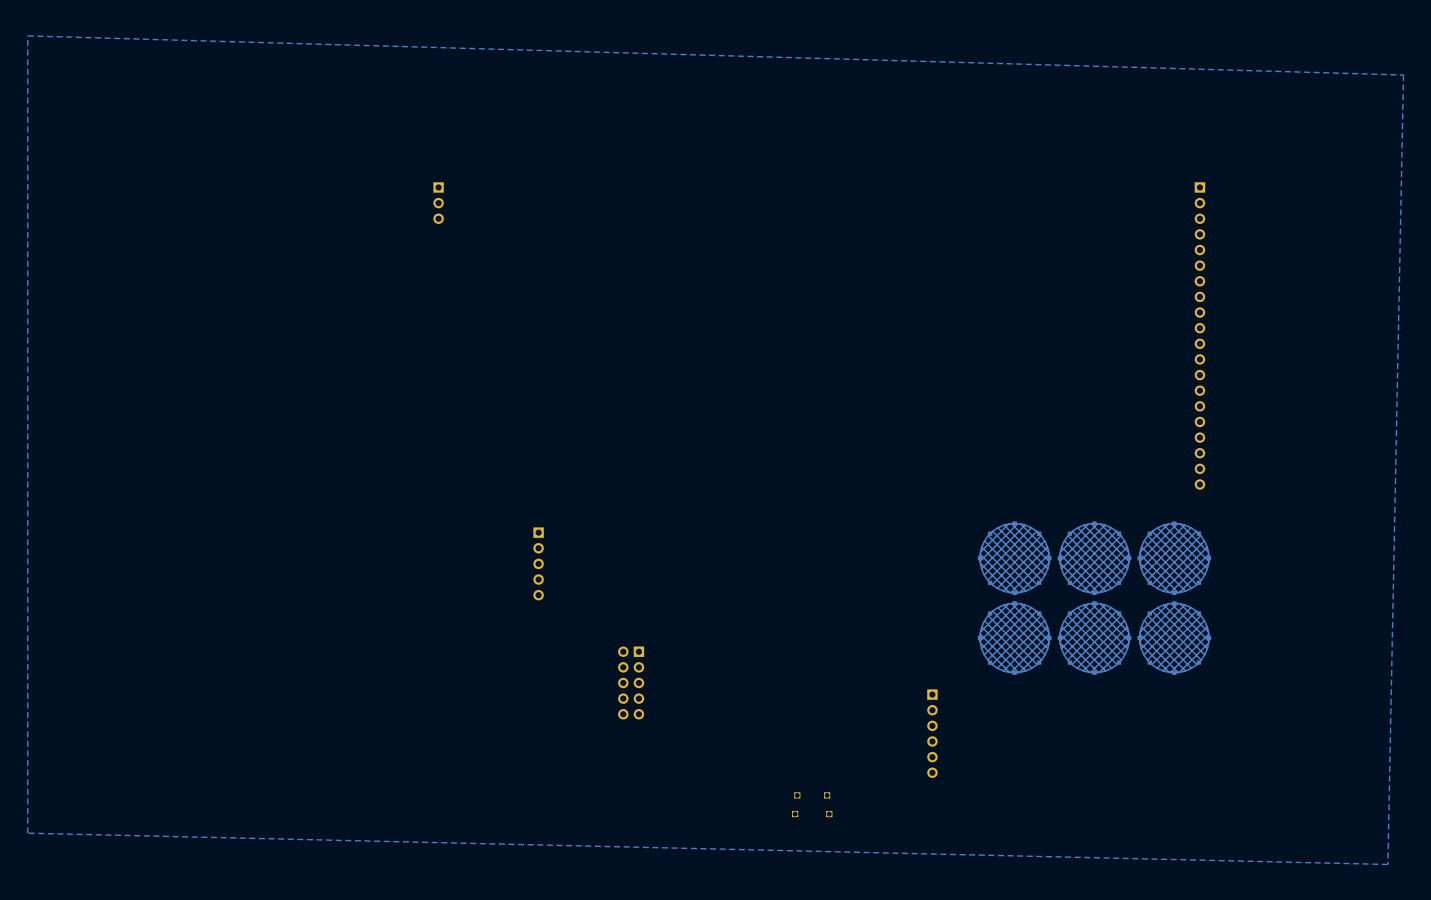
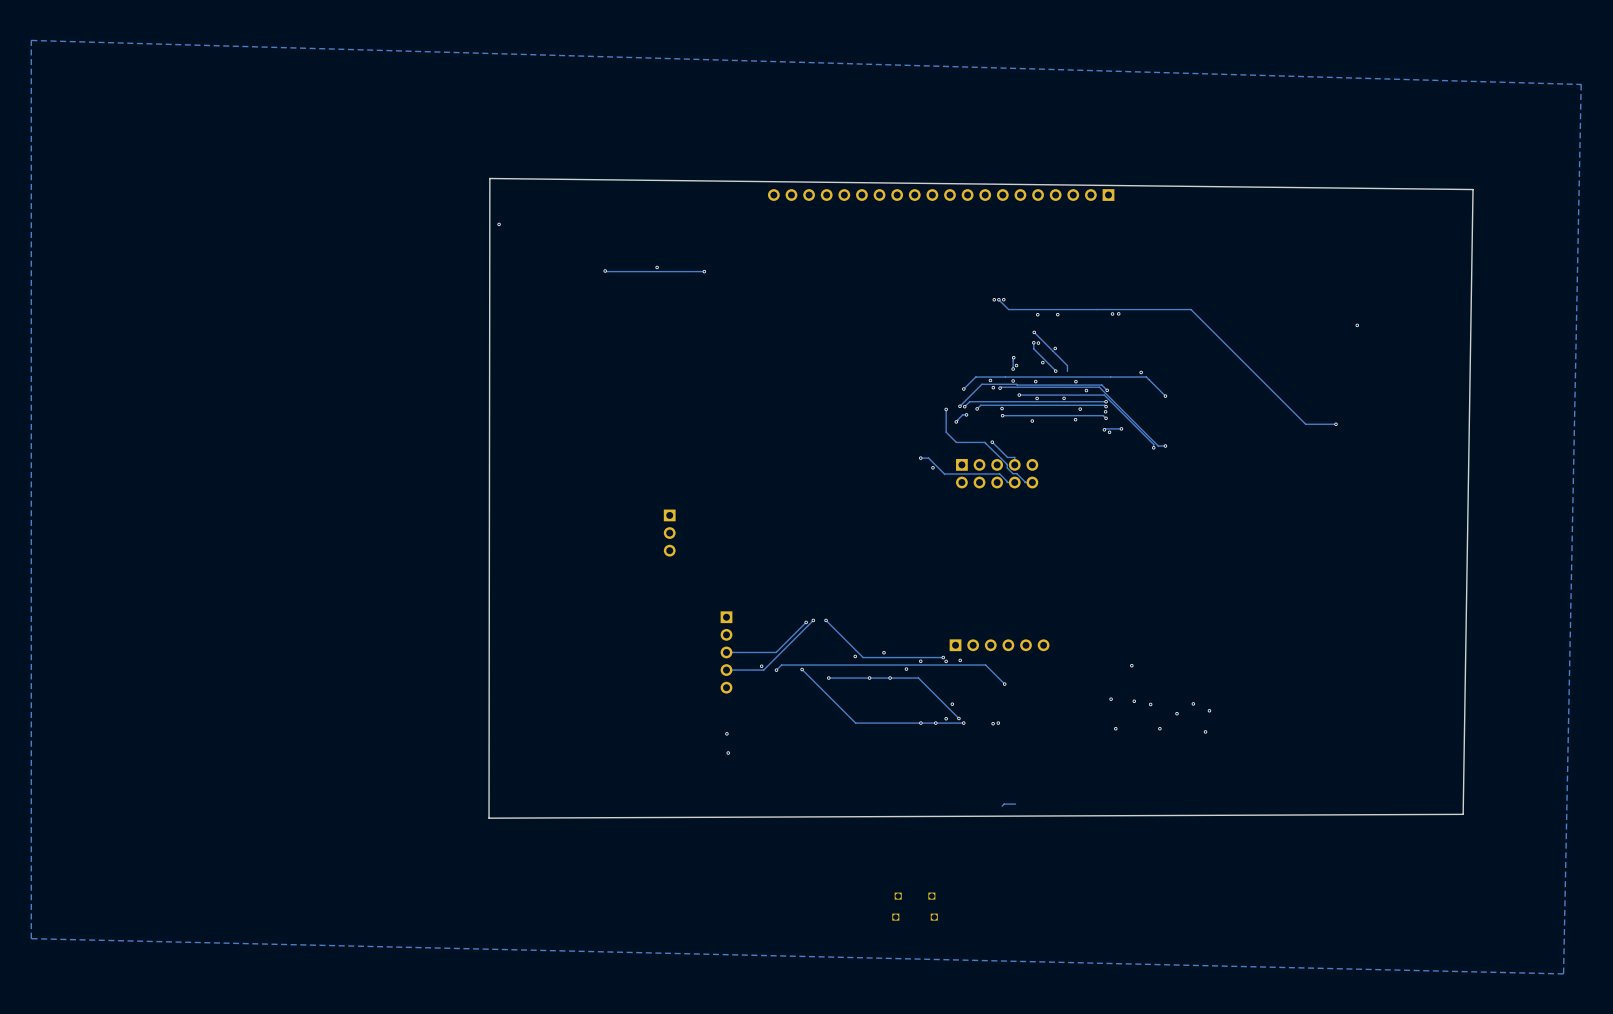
board edge: none -> (489, 178) (489, 818) (1463, 814) (1473, 189) (489, 178)
part: none -> (941, 195)
via: none -> (499, 224)
part: (438, 203) -> none
via: none -> (657, 267)
track: none -> (605, 270) (704, 271)
via: none -> (605, 270)
via: none -> (704, 271)
via: none -> (994, 299)
track: none -> (998, 299) (1008, 309) (1190, 309) (1305, 424) (1336, 424)
via: none -> (998, 299)
via: none -> (1003, 299)
via: none -> (1112, 314)
via: none -> (1118, 313)
via: none -> (1037, 314)
via: none -> (1057, 314)
via: none -> (1357, 325)
track: none -> (1034, 332) (1067, 365) (1067, 371)
via: none -> (1034, 332)
track: none -> (1033, 342) (1033, 348) (1055, 371)
via: none -> (1033, 342)
via: none -> (1038, 343)
via: none -> (1055, 348)
track: none -> (1013, 357) (1013, 369)
via: none -> (1013, 357)
via: none -> (1042, 362)
via: none -> (1016, 365)
via: none -> (1013, 369)
via: none -> (1055, 371)
via: none -> (1141, 372)
part: (1199, 335) -> none
via: none -> (990, 380)
via: none -> (1013, 380)
via: none -> (1035, 381)
via: none -> (1075, 381)
via: none -> (993, 387)
track: none -> (1000, 388) (1099, 387) (1158, 446) (1165, 446)
via: none -> (1000, 388)
track: none -> (963, 389) (975, 377) (1146, 377) (1165, 396)
via: none -> (963, 389)
via: none -> (1086, 390)
track: none -> (1107, 390) (1101, 385) (981, 384) (959, 406)
via: none -> (1107, 390)
track: none -> (1019, 395) (1104, 395) (1153, 444) (1153, 447)
via: none -> (1019, 395)
via: none -> (1165, 396)
via: none -> (1037, 398)
via: none -> (1064, 398)
track: none -> (1106, 401) (969, 401) (964, 406)
via: none -> (1106, 401)
via: none -> (959, 406)
via: none -> (964, 406)
track: none -> (1106, 406) (980, 405) (977, 408)
via: none -> (1106, 406)
via: none -> (977, 408)
via: none -> (1002, 408)
track: none -> (946, 409) (946, 432) (956, 442) (984, 442) (1007, 464) (1007, 468) (1012, 473) (1016, 473) (1024, 482) (1032, 482)
via: none -> (946, 409)
via: none -> (1080, 409)
via: none -> (1105, 411)
track: none -> (966, 414) (962, 414) (956, 421)
via: none -> (966, 414)
track: none -> (1002, 415) (1103, 415) (1106, 418)
via: none -> (1002, 415)
via: none -> (1106, 418)
via: none -> (1075, 419)
via: none -> (1032, 420)
via: none -> (956, 421)
via: none -> (1336, 424)
track: none -> (1121, 428) (1104, 429)
via: none -> (1121, 428)
via: none -> (1104, 429)
via: none -> (1109, 432)
track: none -> (992, 442) (1007, 457) (1014, 457) (1014, 464)
via: none -> (992, 442)
via: none -> (1165, 446)
via: none -> (1153, 447)
track: none -> (920, 458) (928, 458) (944, 473) (999, 473) (1007, 482) (1014, 482)
via: none -> (920, 458)
via: none -> (932, 467)
part: none -> (997, 473)
part: none -> (669, 533)
track: none -> (813, 620) (763, 670) (726, 670)
via: none -> (813, 620)
track: none -> (826, 620) (863, 657) (943, 657)
via: none -> (826, 620)
track: none -> (806, 622) (776, 652) (726, 652)
via: none -> (806, 622)
part: (1014, 558) -> none
part: (1094, 558) -> none
part: (1174, 558) -> none
part position: (538, 563) -> (726, 652)
part: none -> (999, 645)
via: none -> (883, 652)
via: none -> (855, 656)
via: none -> (943, 657)
via: none -> (920, 661)
via: none -> (960, 660)
via: none -> (946, 661)
via: none -> (1131, 665)
via: none -> (761, 666)
via: none -> (906, 669)
track: none -> (776, 670) (781, 665) (985, 665) (1004, 684)
via: none -> (776, 670)
track: none -> (802, 669) (855, 723) (963, 723)
via: none -> (802, 669)
track: none -> (828, 678) (918, 678) (958, 718)
via: none -> (828, 678)
via: none -> (869, 678)
via: none -> (890, 678)
via: none -> (1004, 684)
via: none -> (1111, 699)
via: none -> (1134, 701)
via: none -> (1193, 703)
via: none -> (952, 704)
via: none -> (1150, 704)
via: none -> (1209, 710)
via: none -> (1177, 713)
via: none -> (946, 718)
via: none -> (958, 718)
part: (1014, 638) -> none
part: (1094, 638) -> none
part: (1174, 638) -> none
via: none -> (920, 723)
via: none -> (935, 723)
via: none -> (963, 723)
via: none -> (998, 723)
via: none -> (993, 723)
via: none -> (1115, 728)
via: none -> (1159, 728)
via: none -> (1205, 731)
via: none -> (726, 733)
via: none -> (728, 752)
part: (631, 682) -> none
track: none -> (1015, 804) (1004, 804) (1002, 806)
part: (932, 733) -> none

